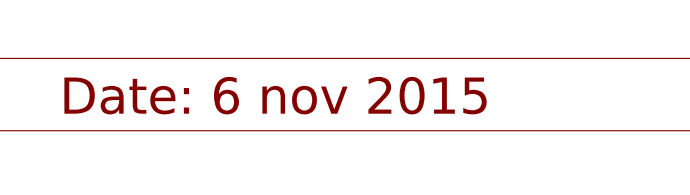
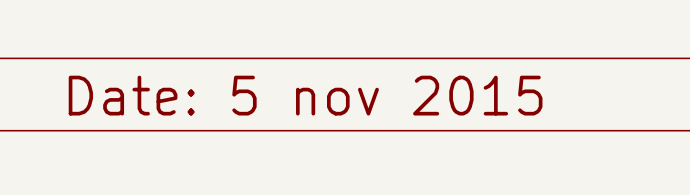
title block: Date: 6 nov 2015 (275, 95) -> Date: 5 nov 2015 (305, 95)

